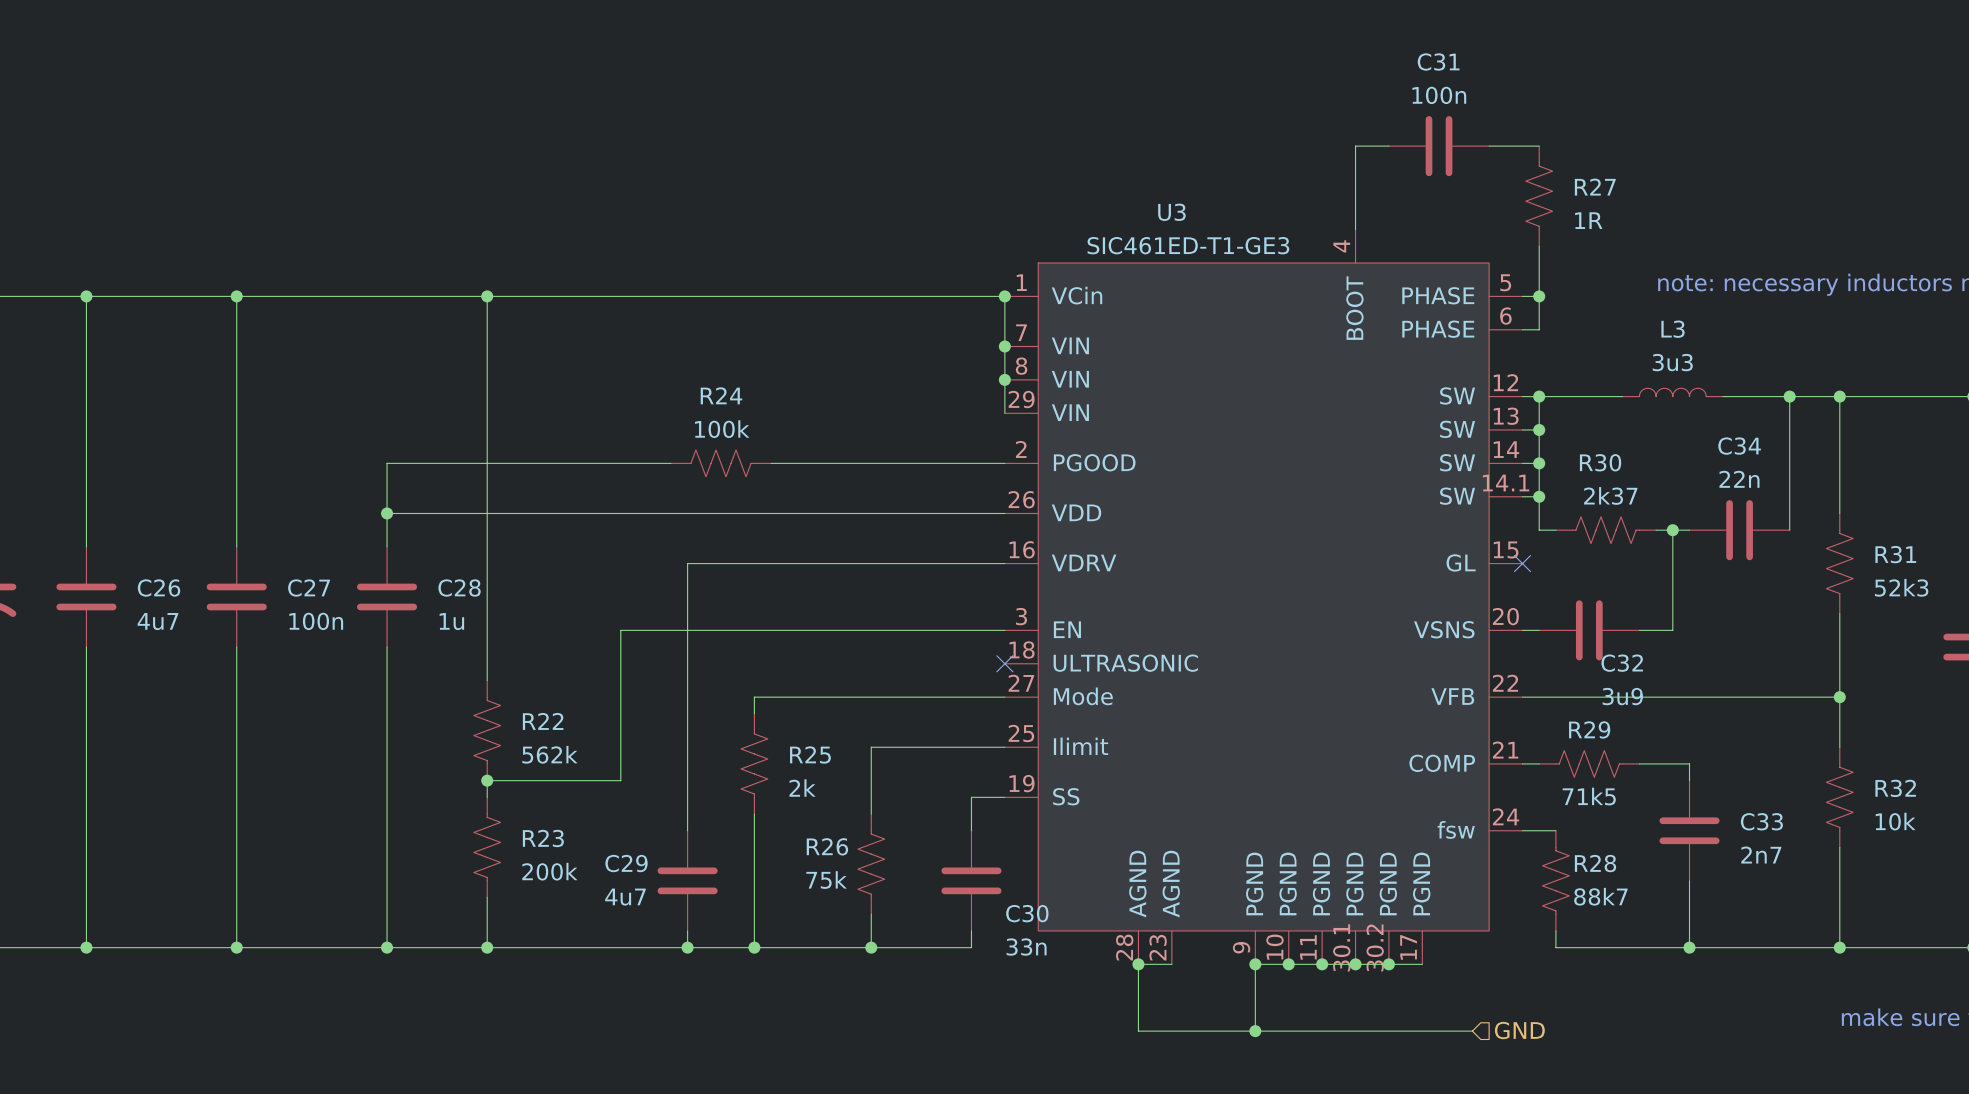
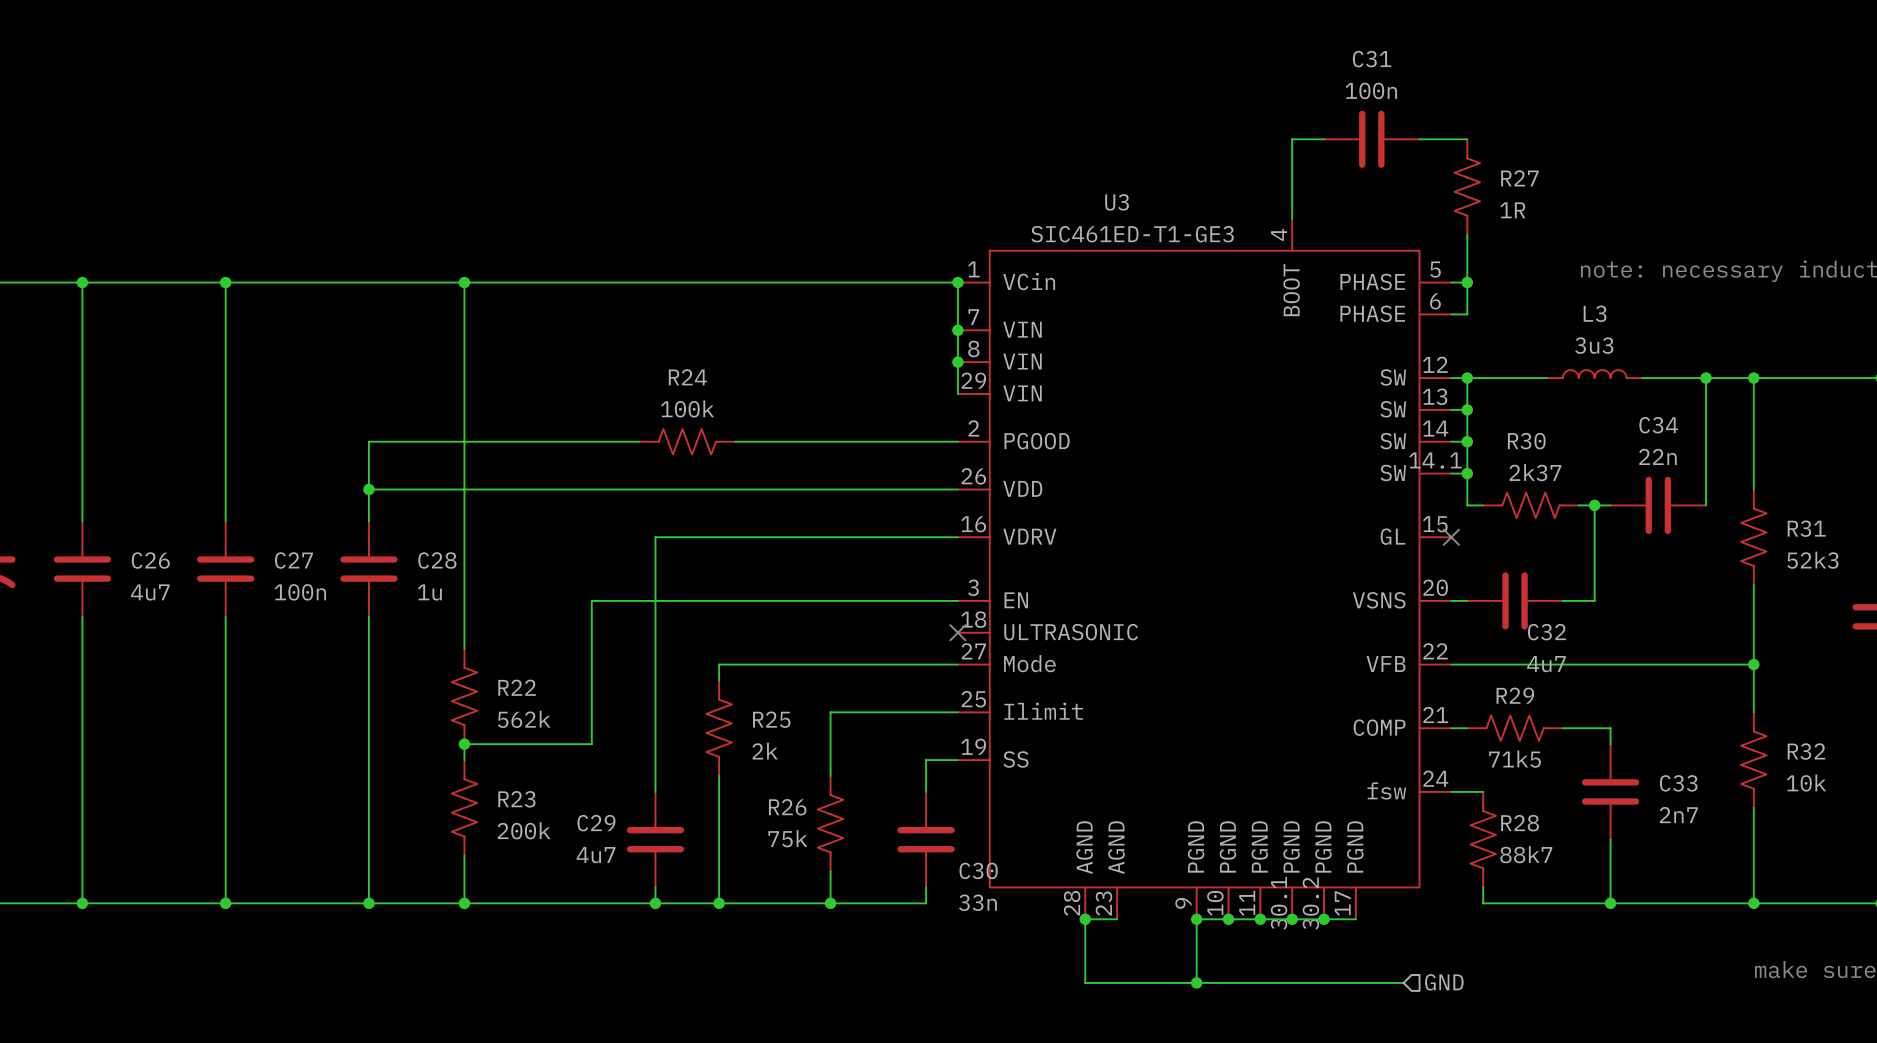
C32 value: 3u9 (1622, 696) -> 4u7 (1546, 664)

